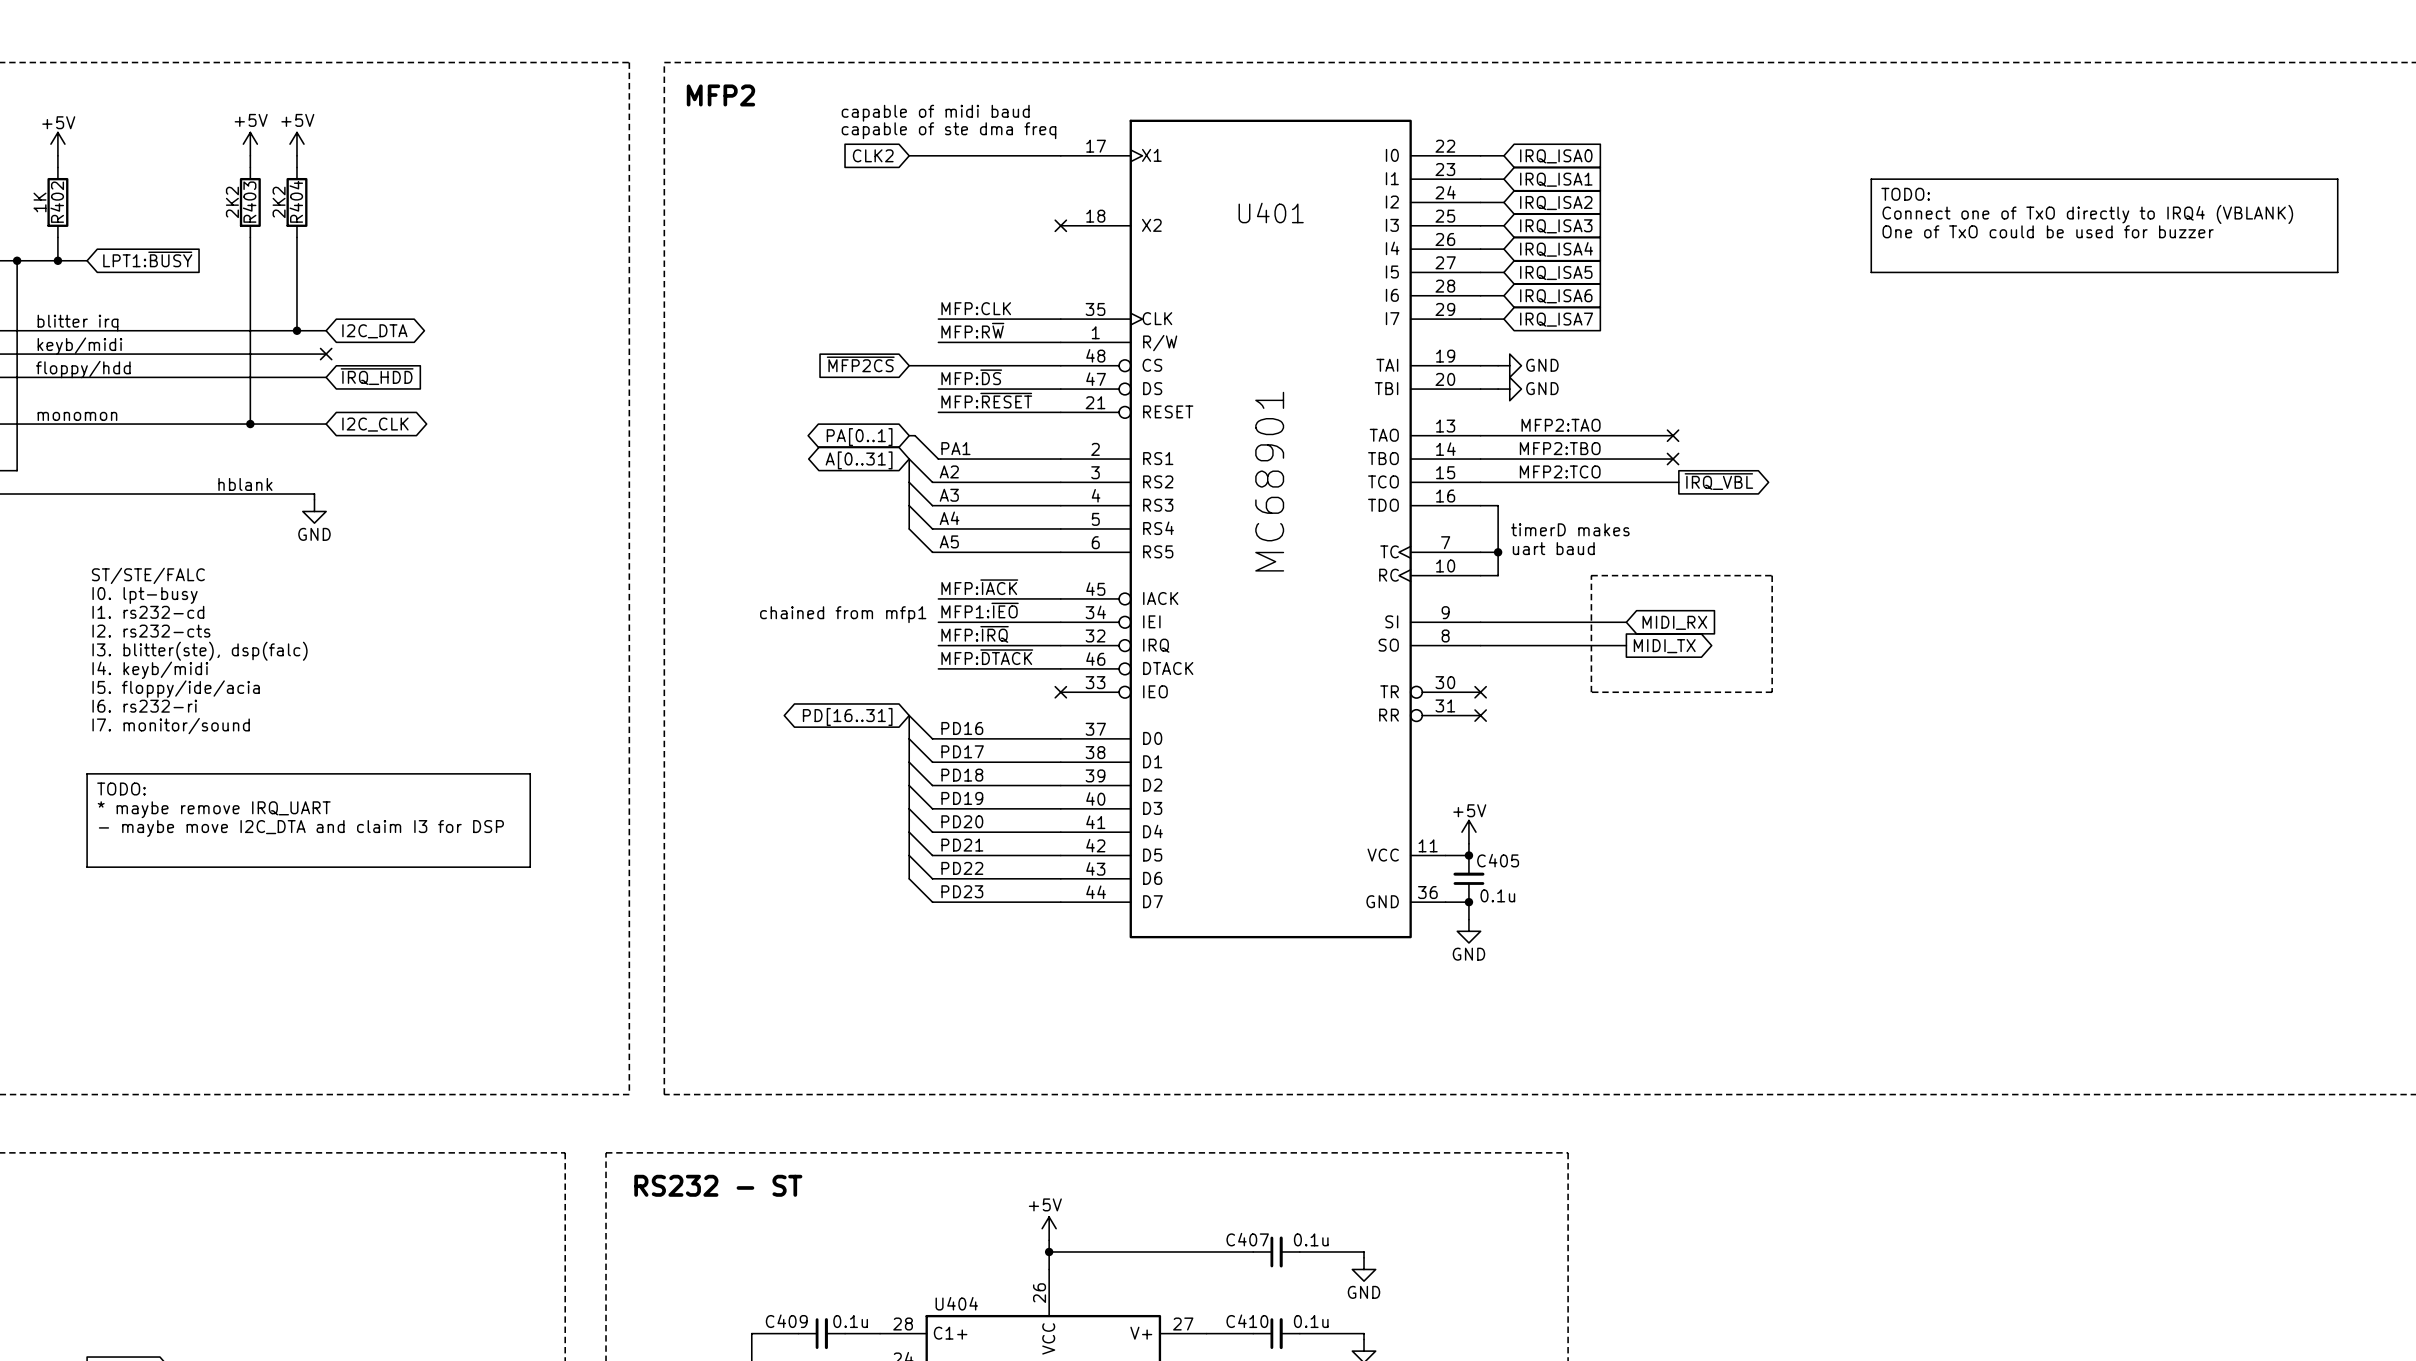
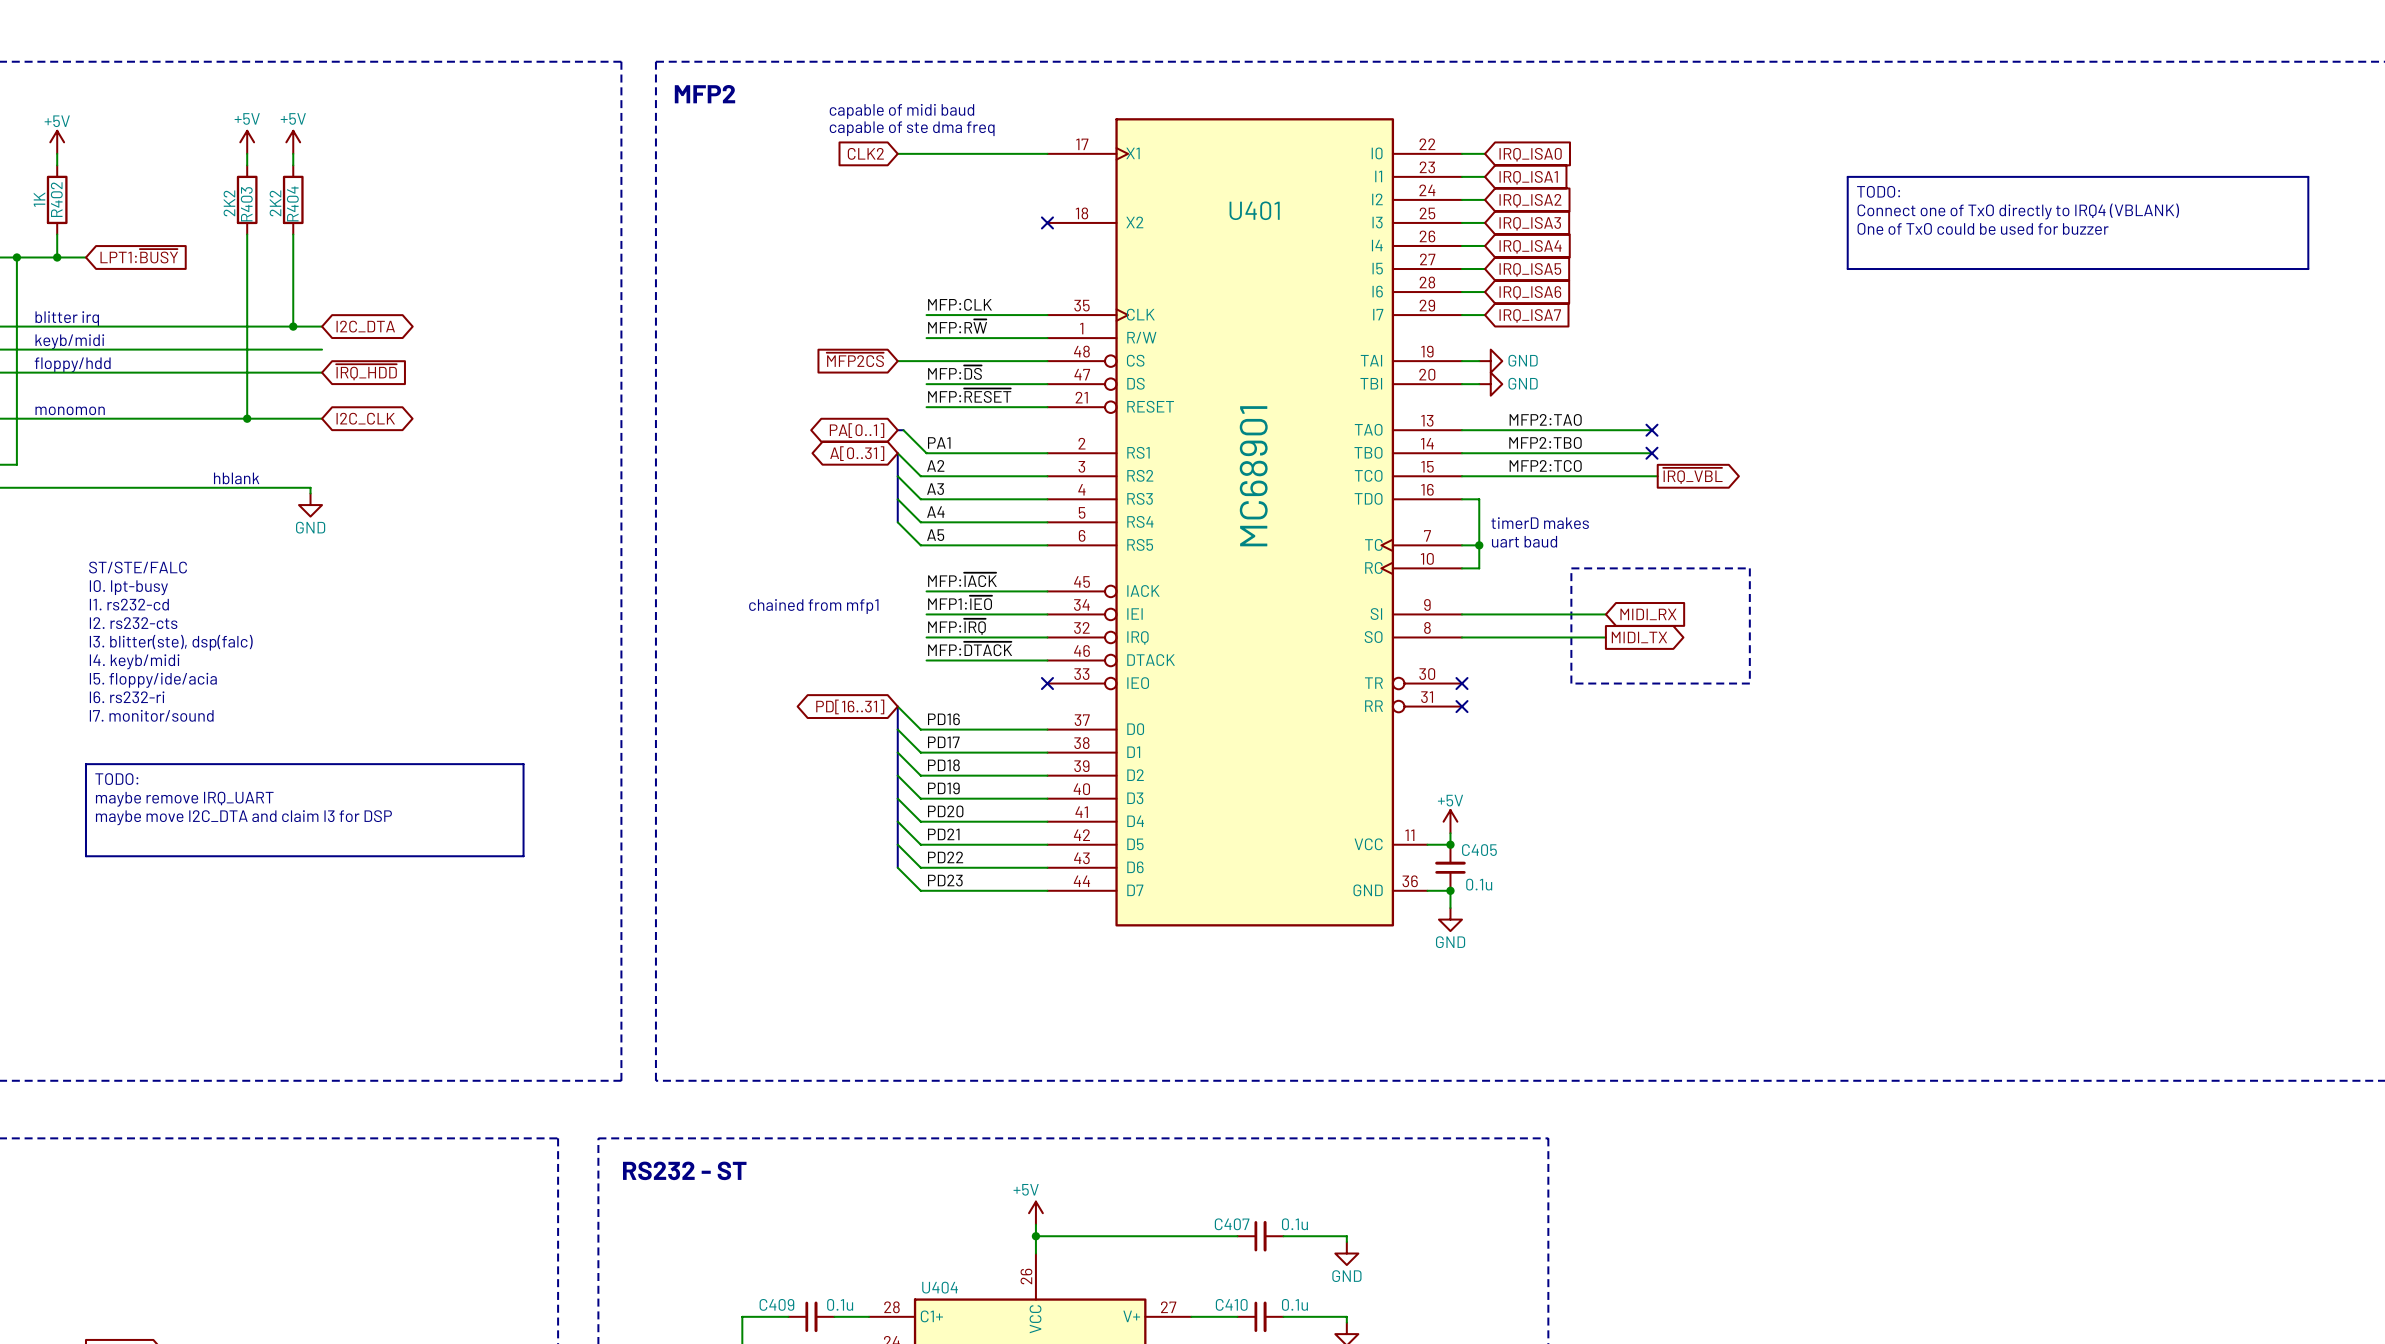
no-connect mark: (326, 354) -> none
text: * maybe remove IRQ_UART (214, 809) -> maybe remove IRQ_UART (184, 799)
text: - maybe move I2C_DTA and claim I3 for DSP (301, 828) -> maybe move I2C_DTA and claim I3 for DSP (243, 817)

